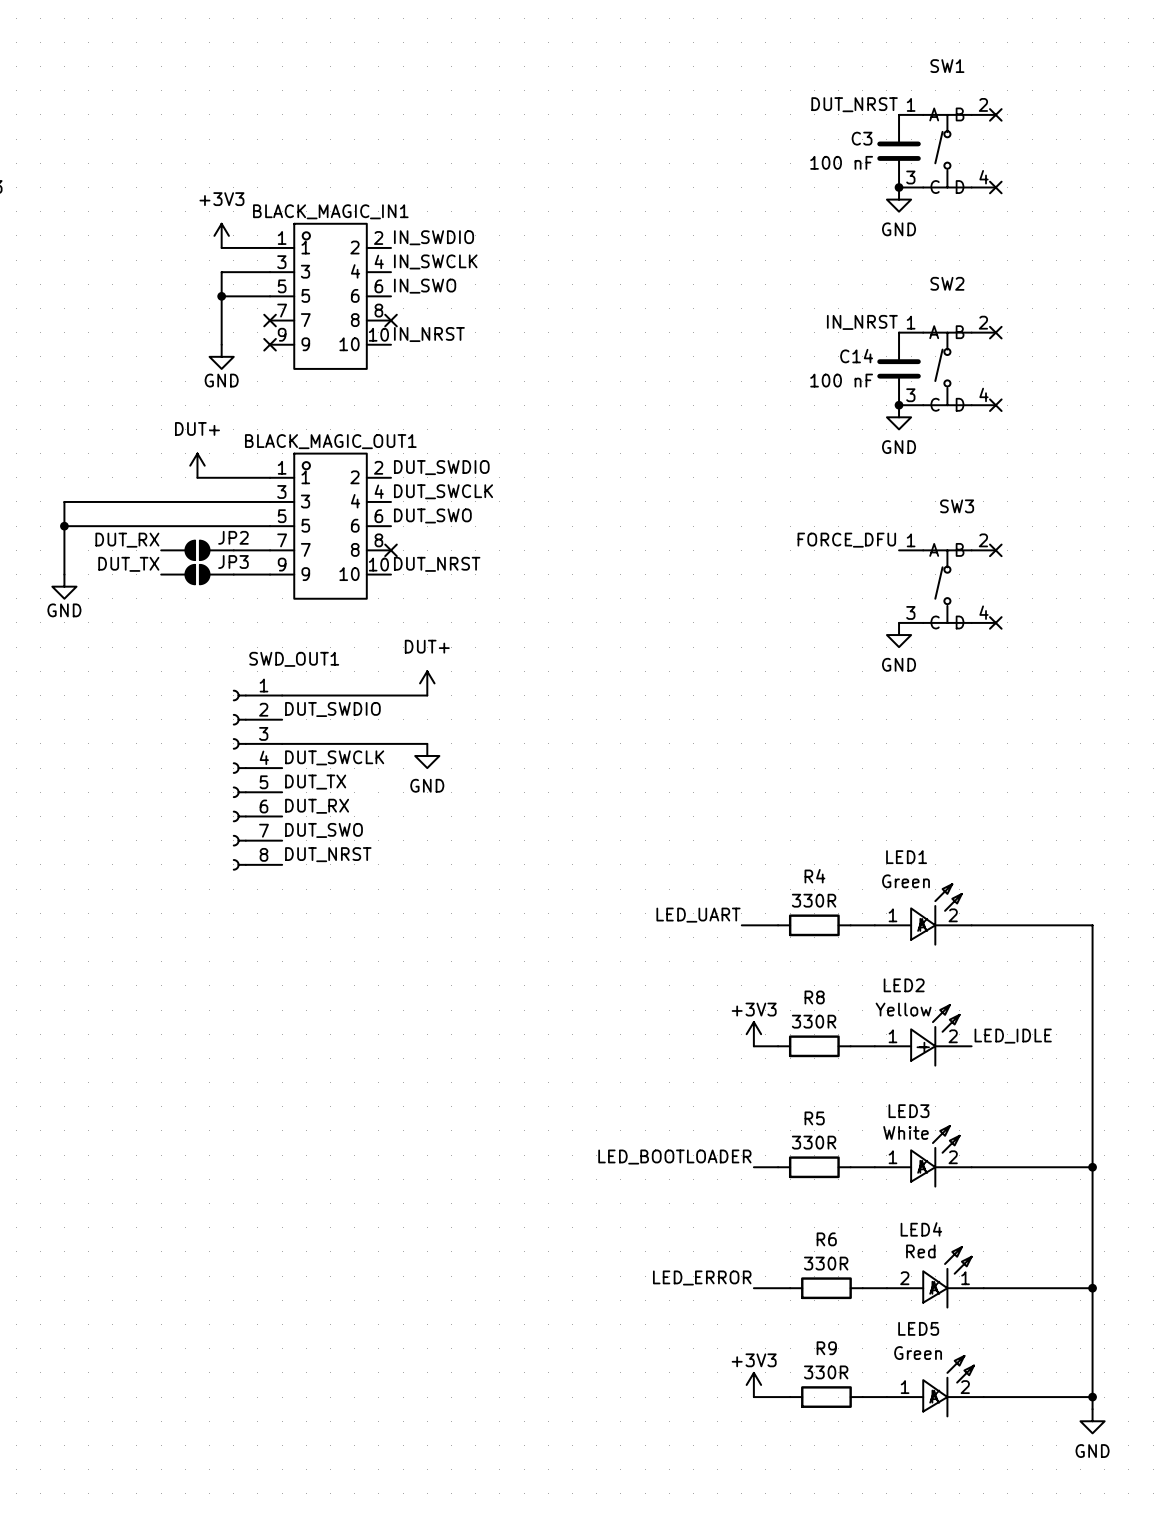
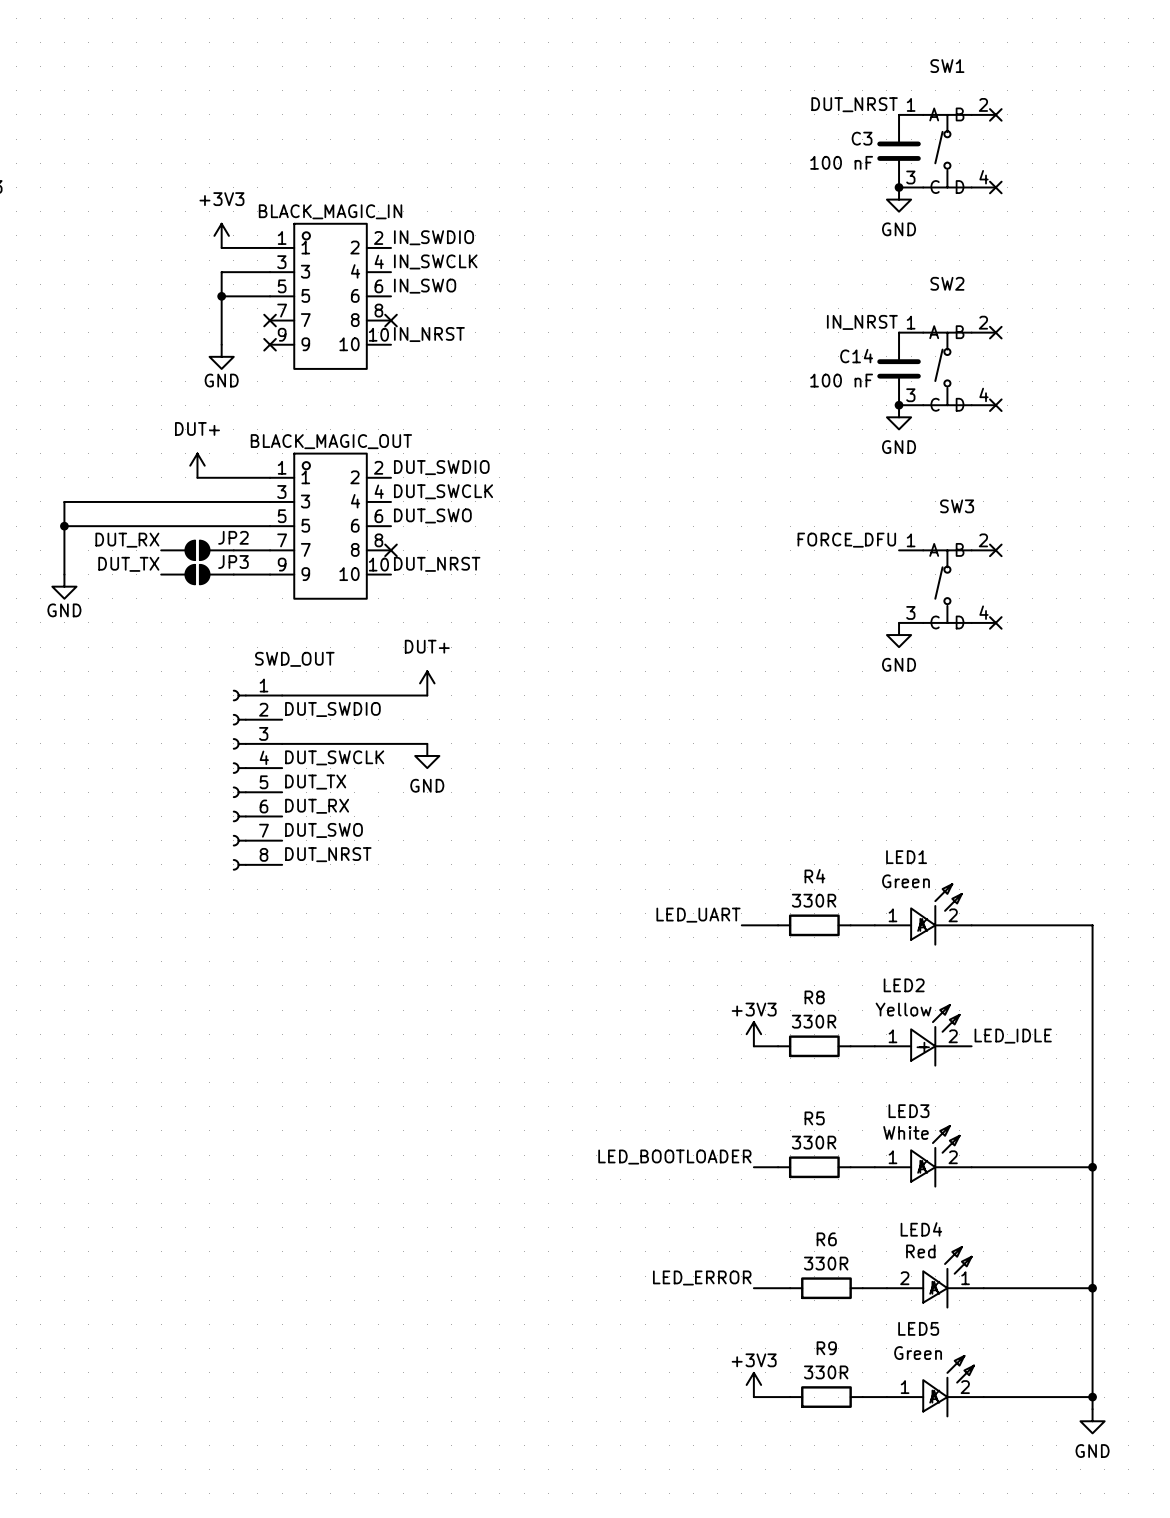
BLACK_MAGIC_IN1 name: BLACK_MAGIC_IN1 (330, 211) -> BLACK_MAGIC_IN (330, 211)
BLACK_MAGIC_OUT1 name: BLACK_MAGIC_OUT1 (330, 441) -> BLACK_MAGIC_OUT (331, 441)
SWD_OUT1 name: SWD_OUT1 (294, 659) -> SWD_OUT (294, 659)

